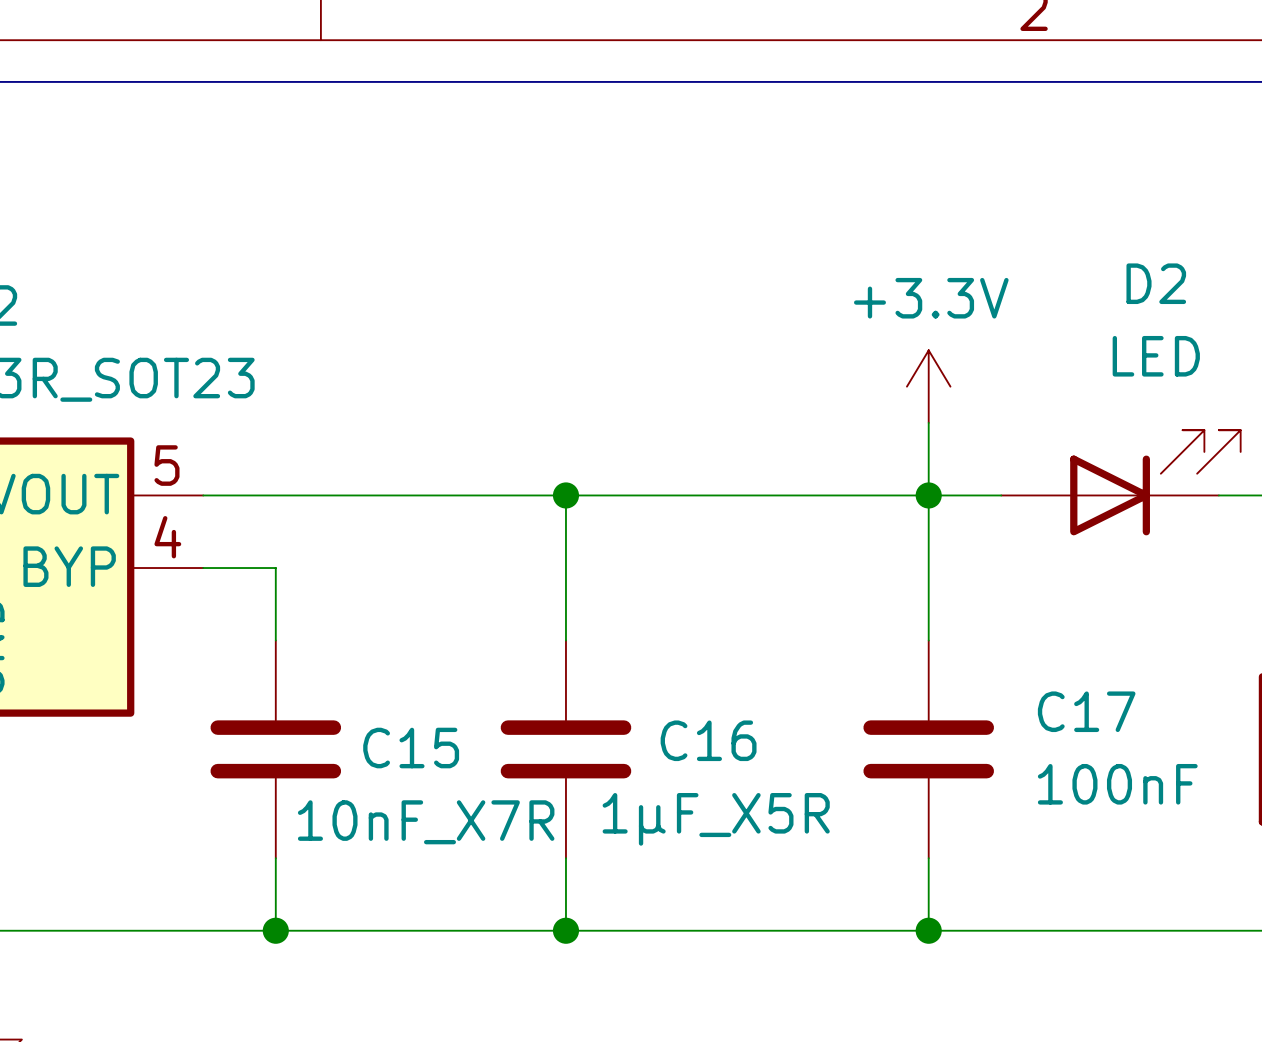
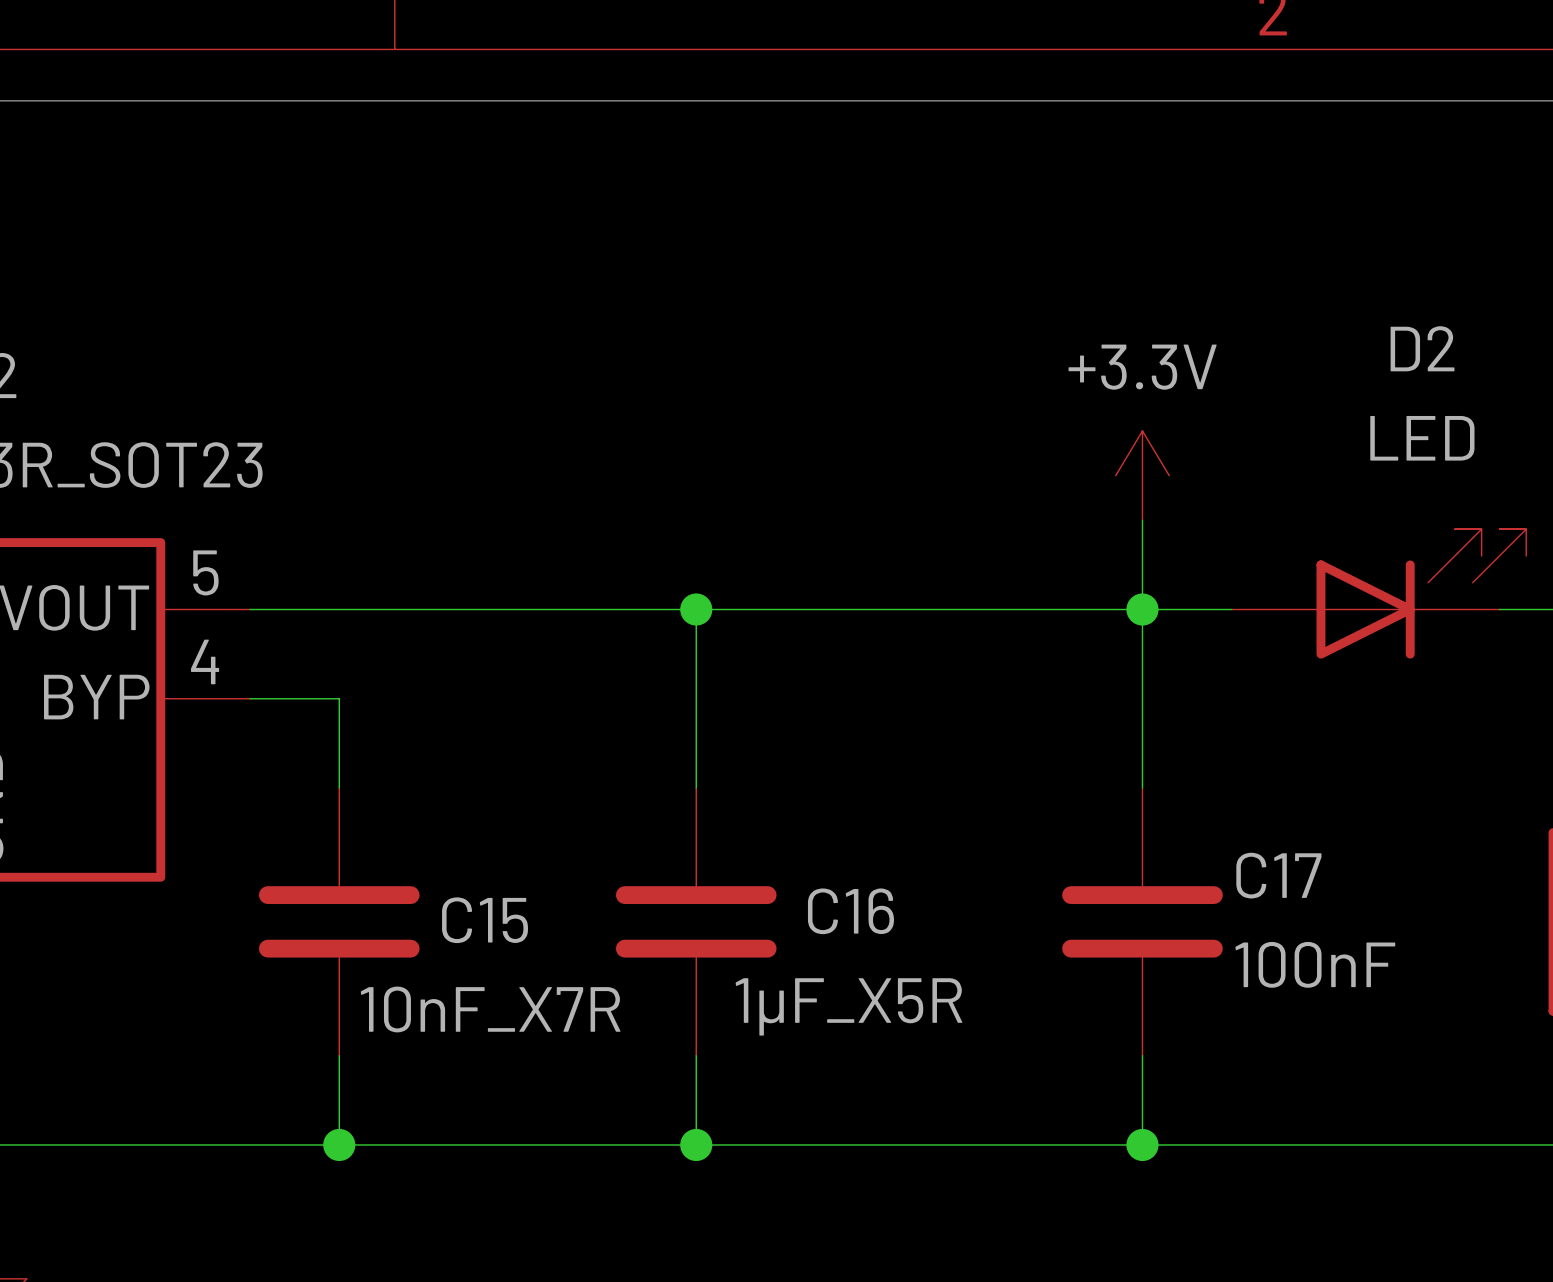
C17 name position: C17 (1086, 711) -> C17 (1278, 875)
C17 value position: 100nF (1117, 784) -> 100nF (1315, 964)

